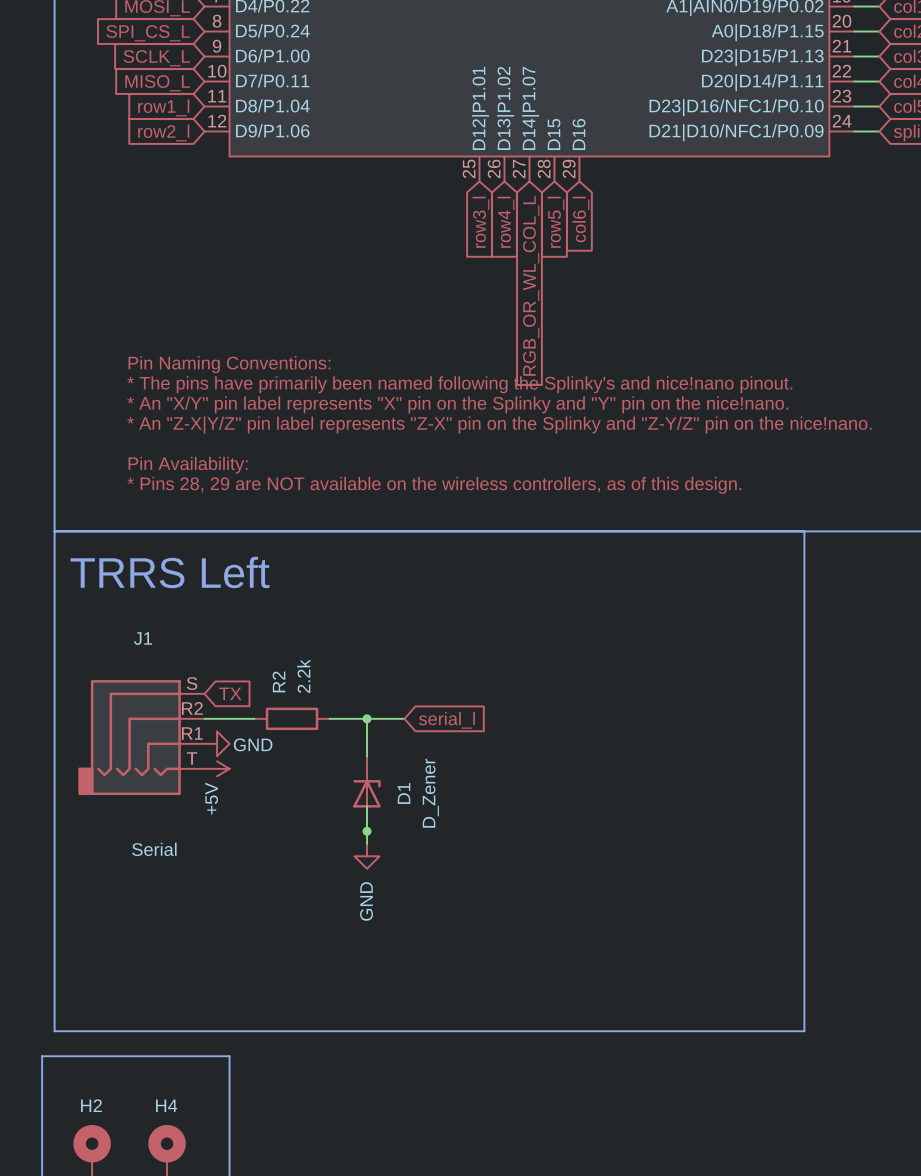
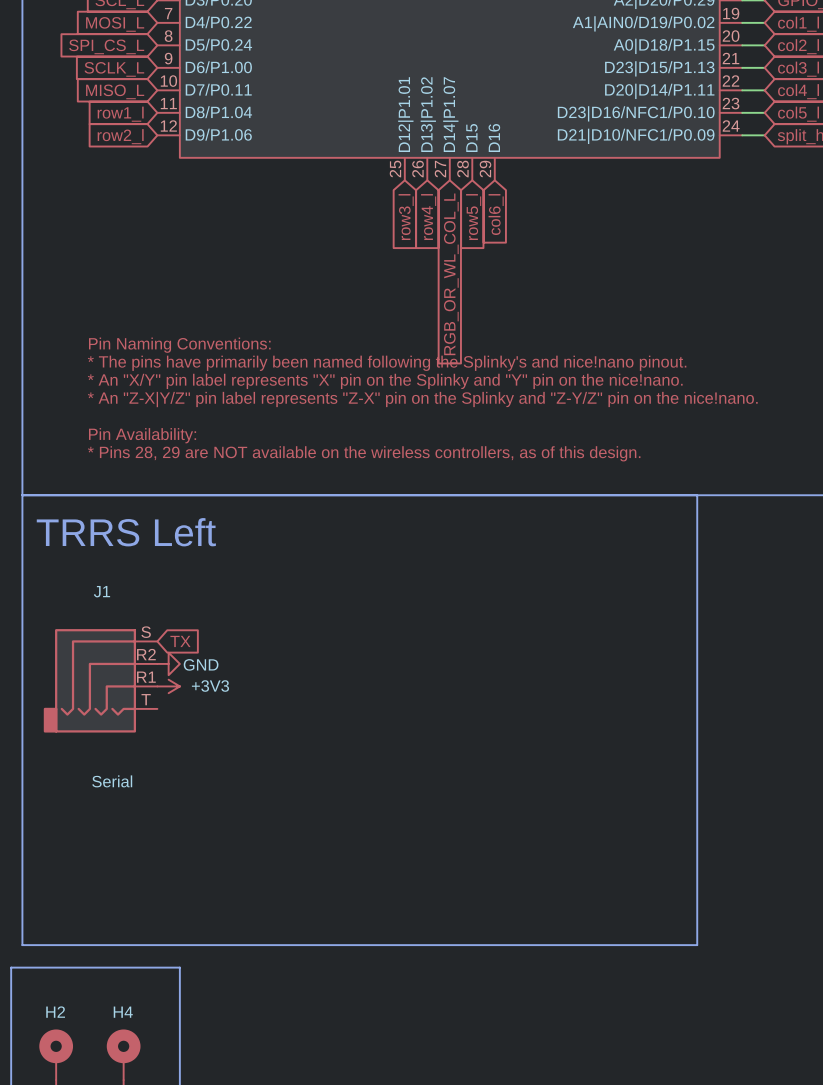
wire: (204, 718) (254, 718) -> none
R2: 2.2k (292, 718) -> none
wire: (329, 718) (404, 718) -> none
wire: (367, 718) (367, 756) -> none
junction: (367, 718) -> none
global label: serial_l (446, 720) -> none
power symbol: GND (217, 743) -> +3V3 (168, 686)
power symbol: +5V (217, 768) -> none
D1: D_Zener (367, 793) -> none
wire: (367, 806) (367, 843) -> none
junction: (367, 831) -> none
power symbol rotation: 0° (367, 856) -> 90° counterclockwise (168, 663)
power symbol position: GND (367, 856) -> GND (168, 663)

